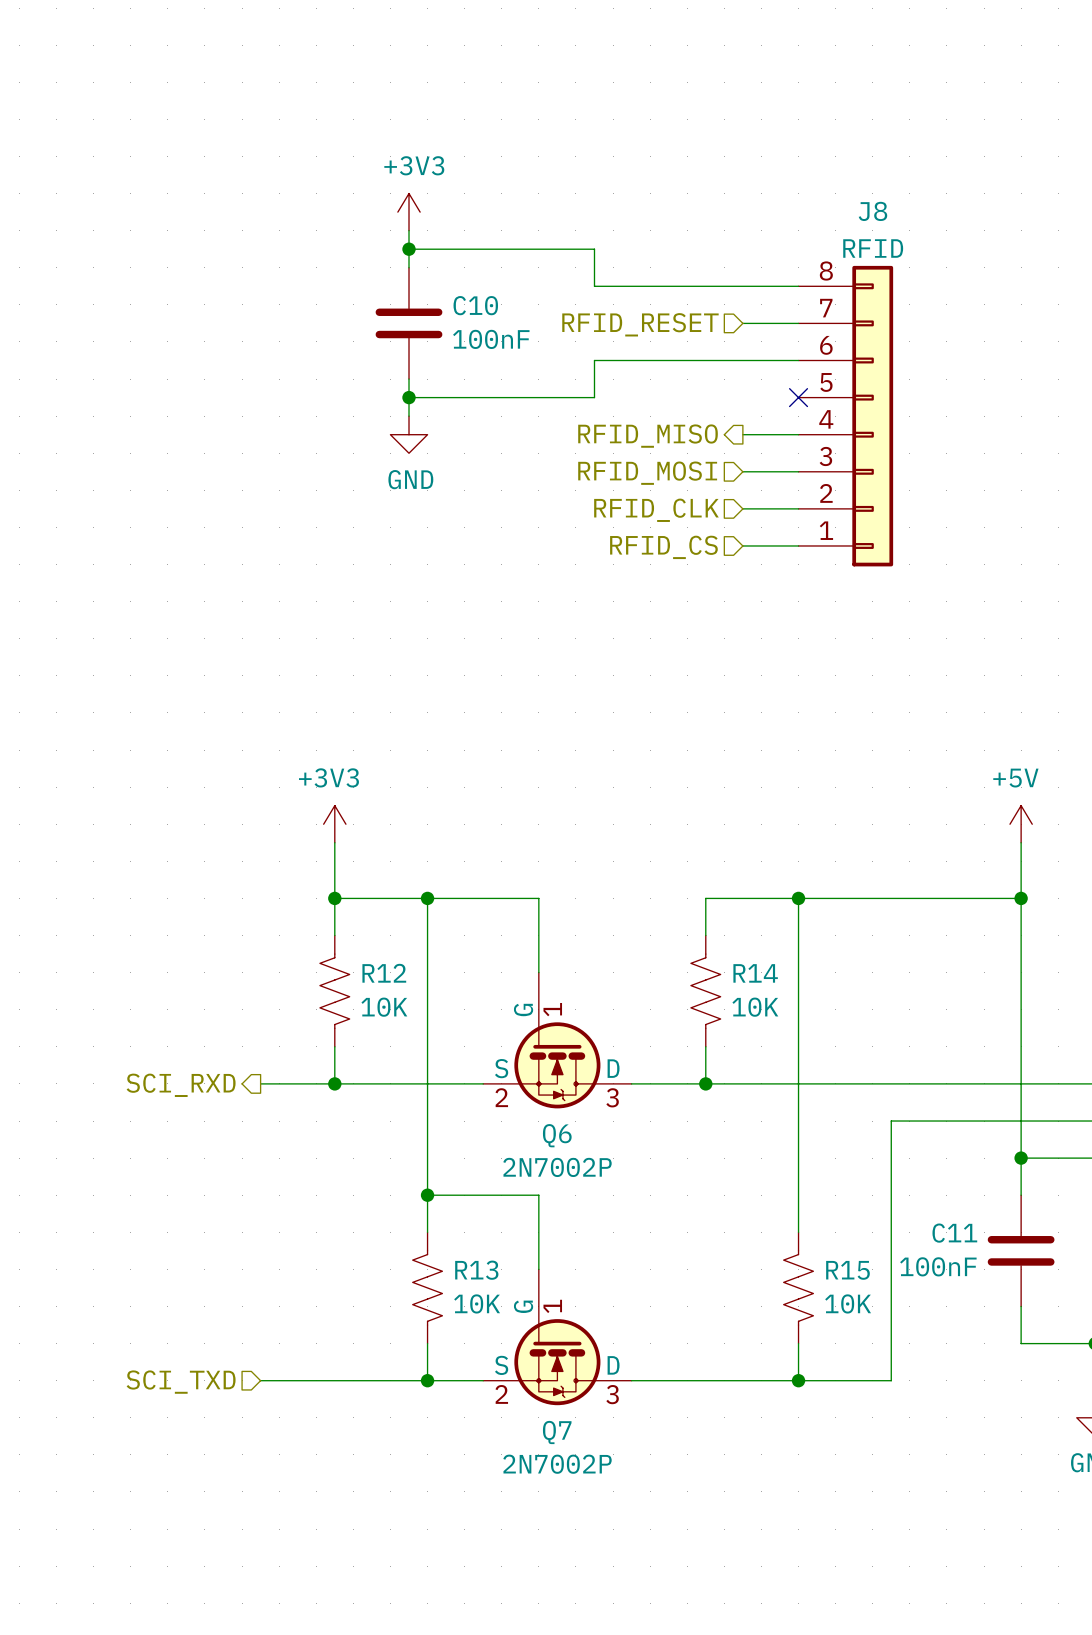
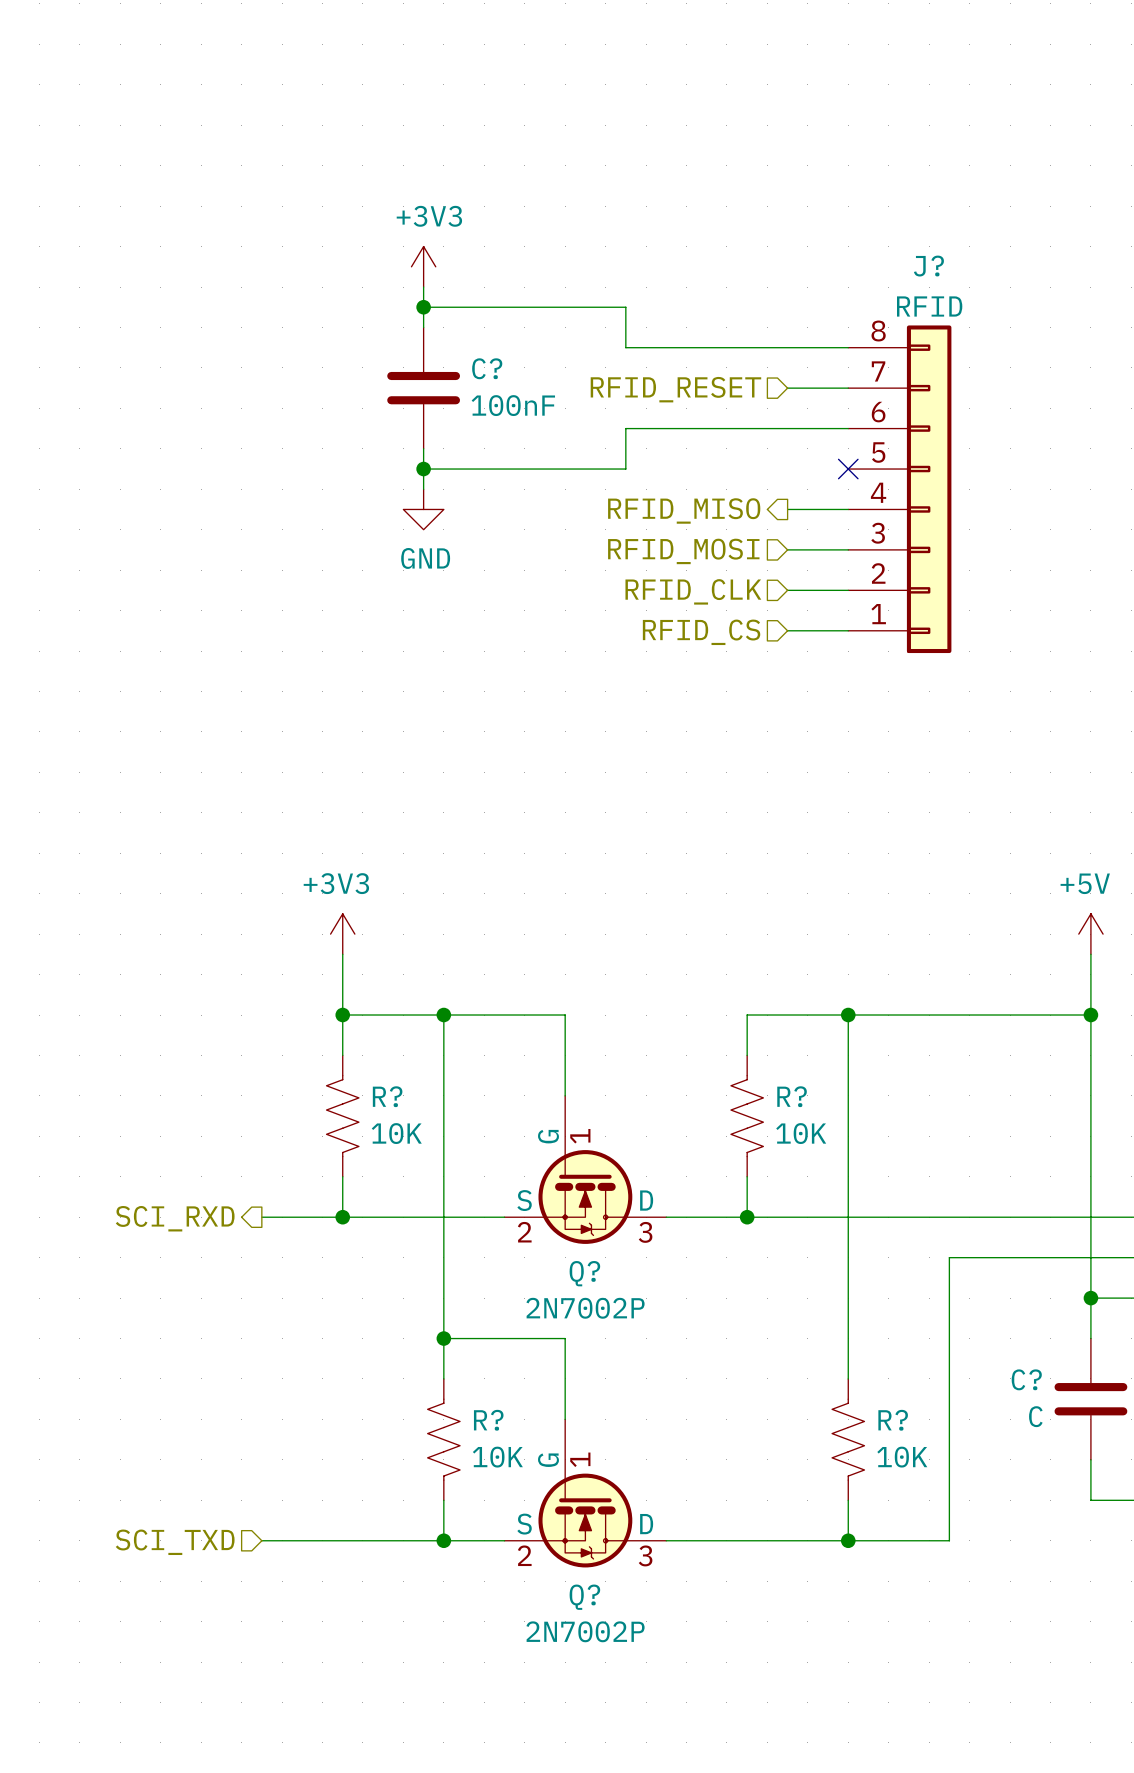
J8 name: J8 (872, 211) -> J? (928, 266)
C10 name: C10 (475, 305) -> C? (487, 368)
R12 name: R12 (384, 973) -> R? (387, 1096)
R14 name: R14 (755, 973) -> R? (792, 1096)
Q6 name: Q6 (557, 1135) -> Q? (584, 1273)
C11 name: C11 (954, 1233) -> C? (1026, 1379)
C11 value: 100nF (938, 1266) -> C (1035, 1416)
R13 name: R13 (476, 1270) -> R? (488, 1420)
R15 name: R15 (847, 1270) -> R? (893, 1420)
Q7 name: Q7 (557, 1432) -> Q? (584, 1597)

